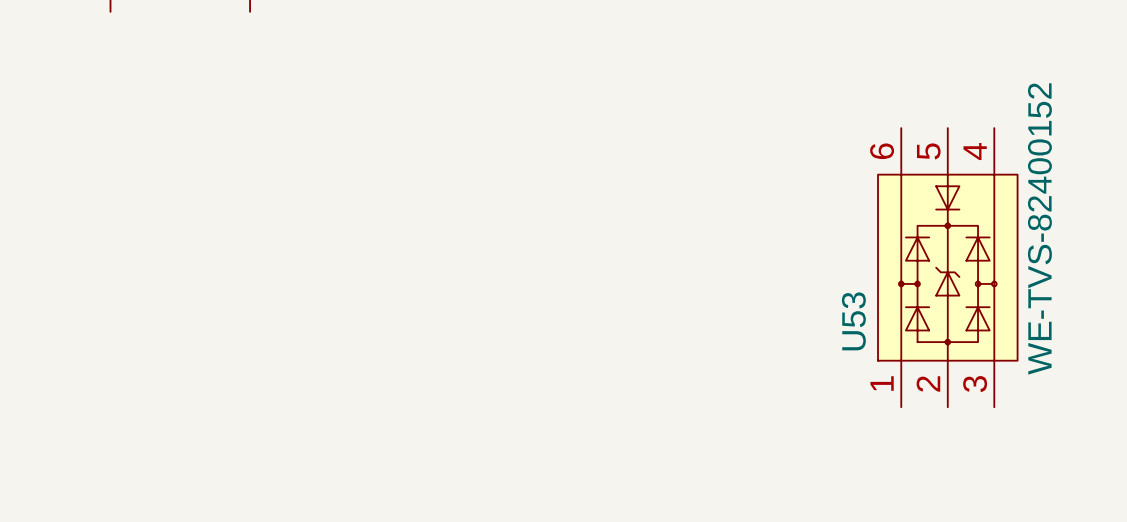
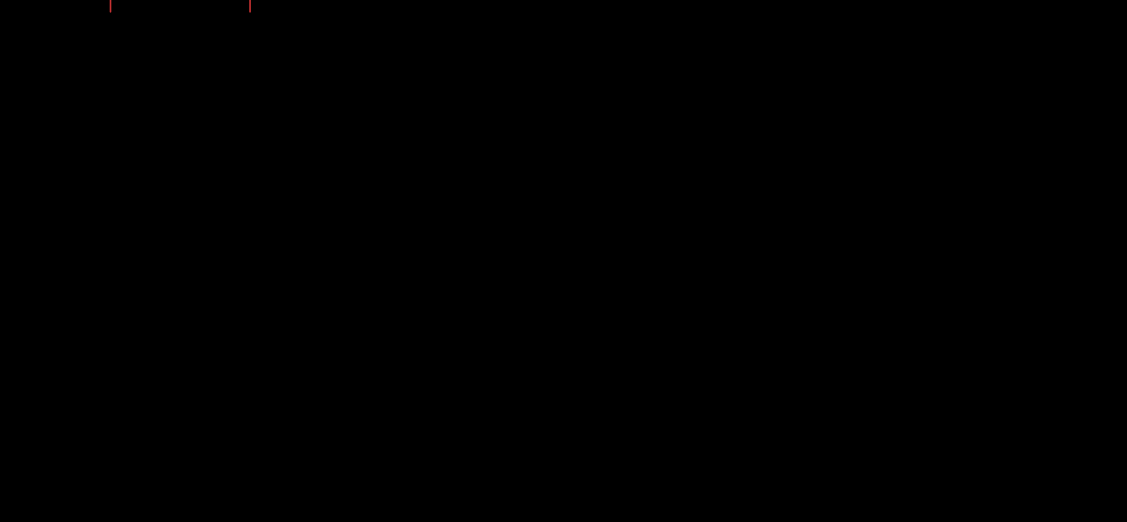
U53: WE-TVS-82400152 (947, 267) -> none

